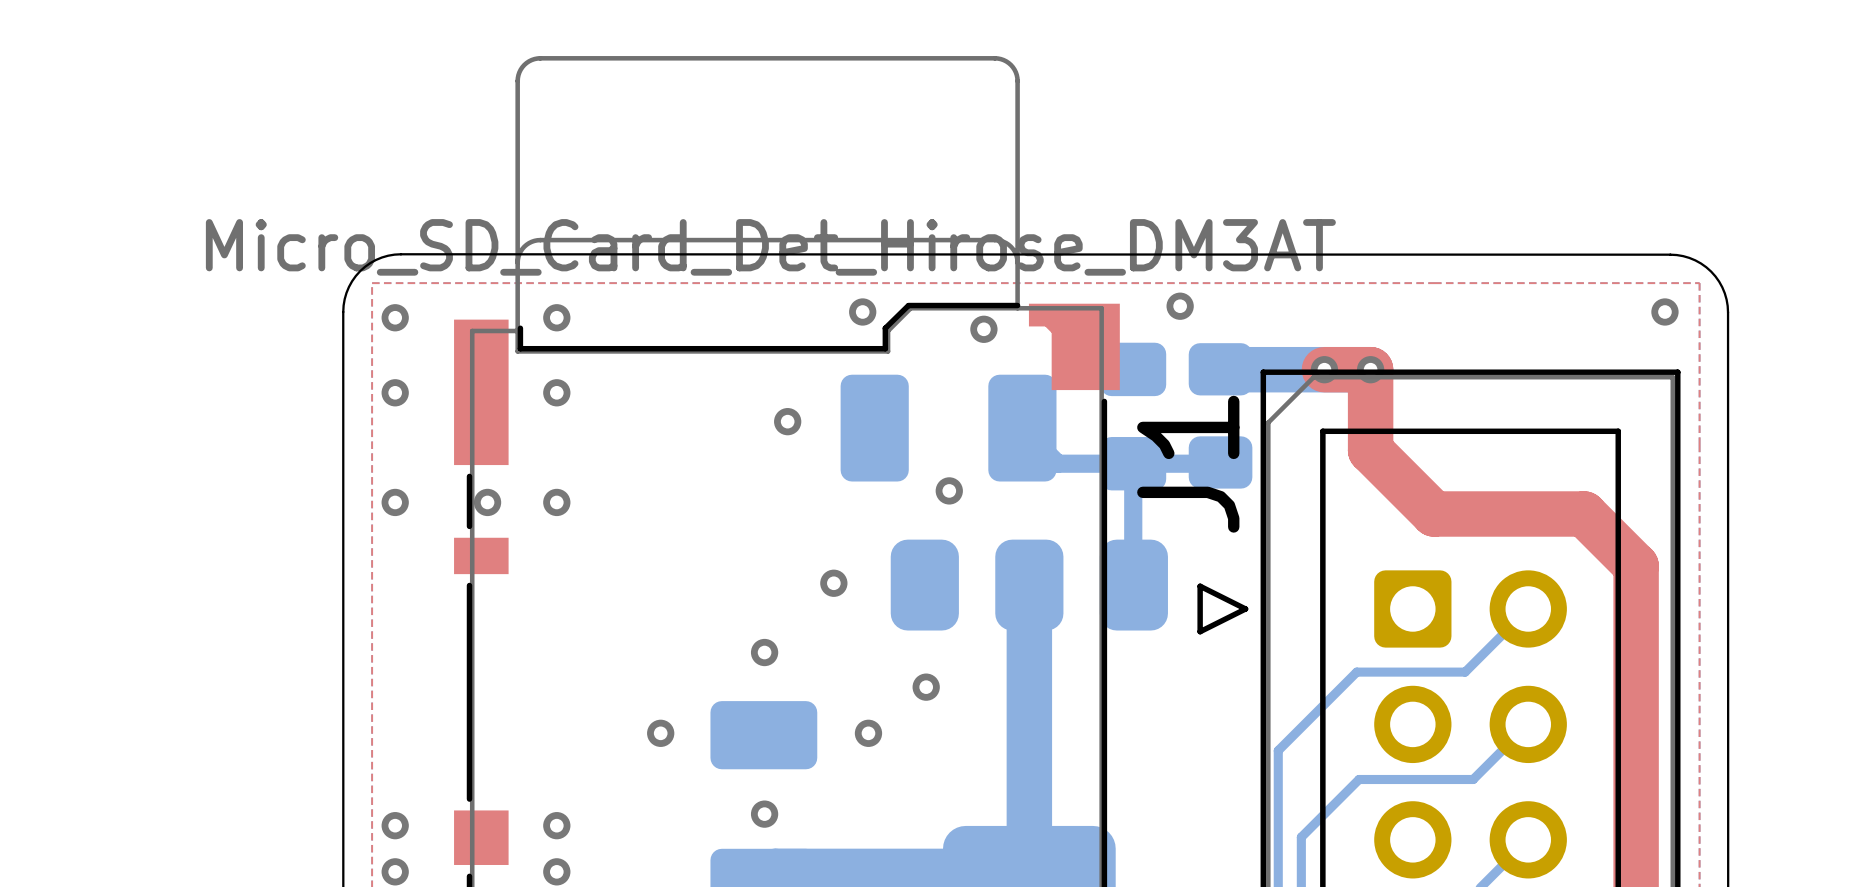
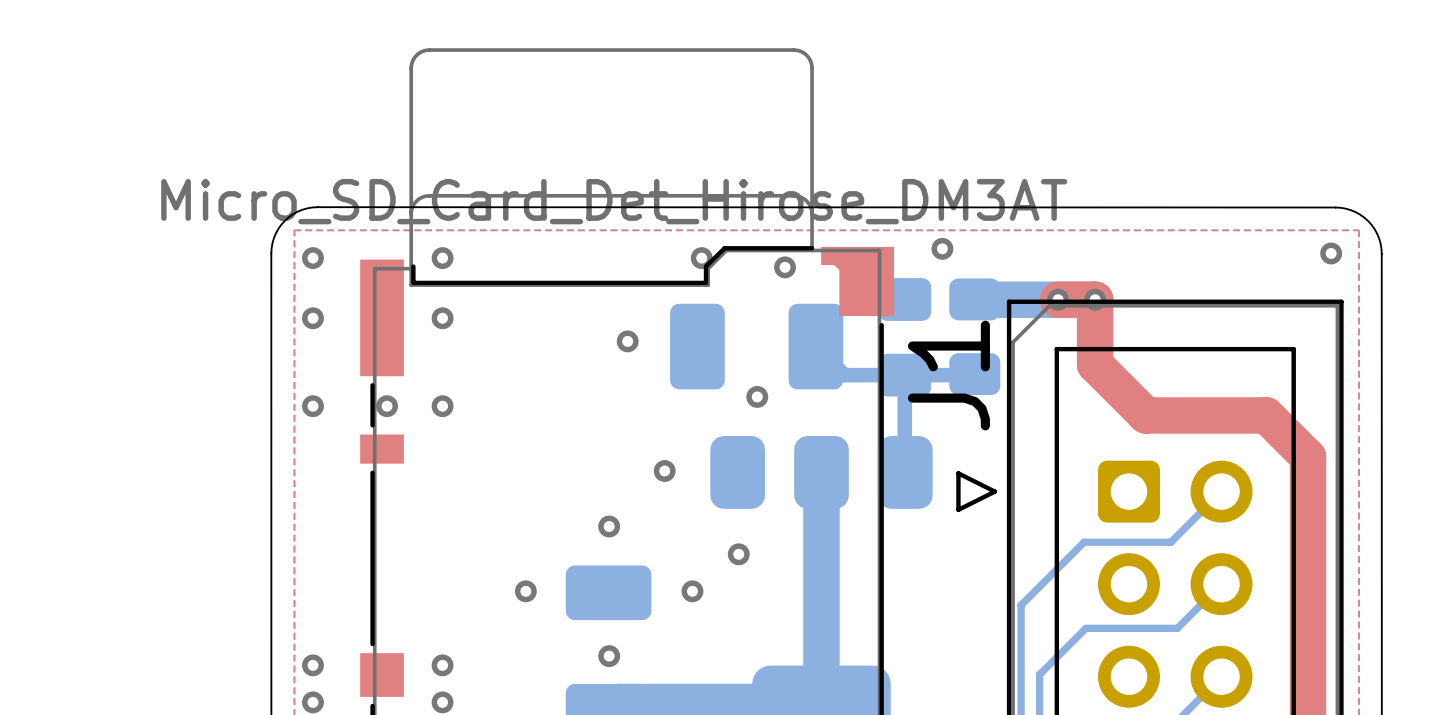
via position: (862, 311) -> (701, 258)

